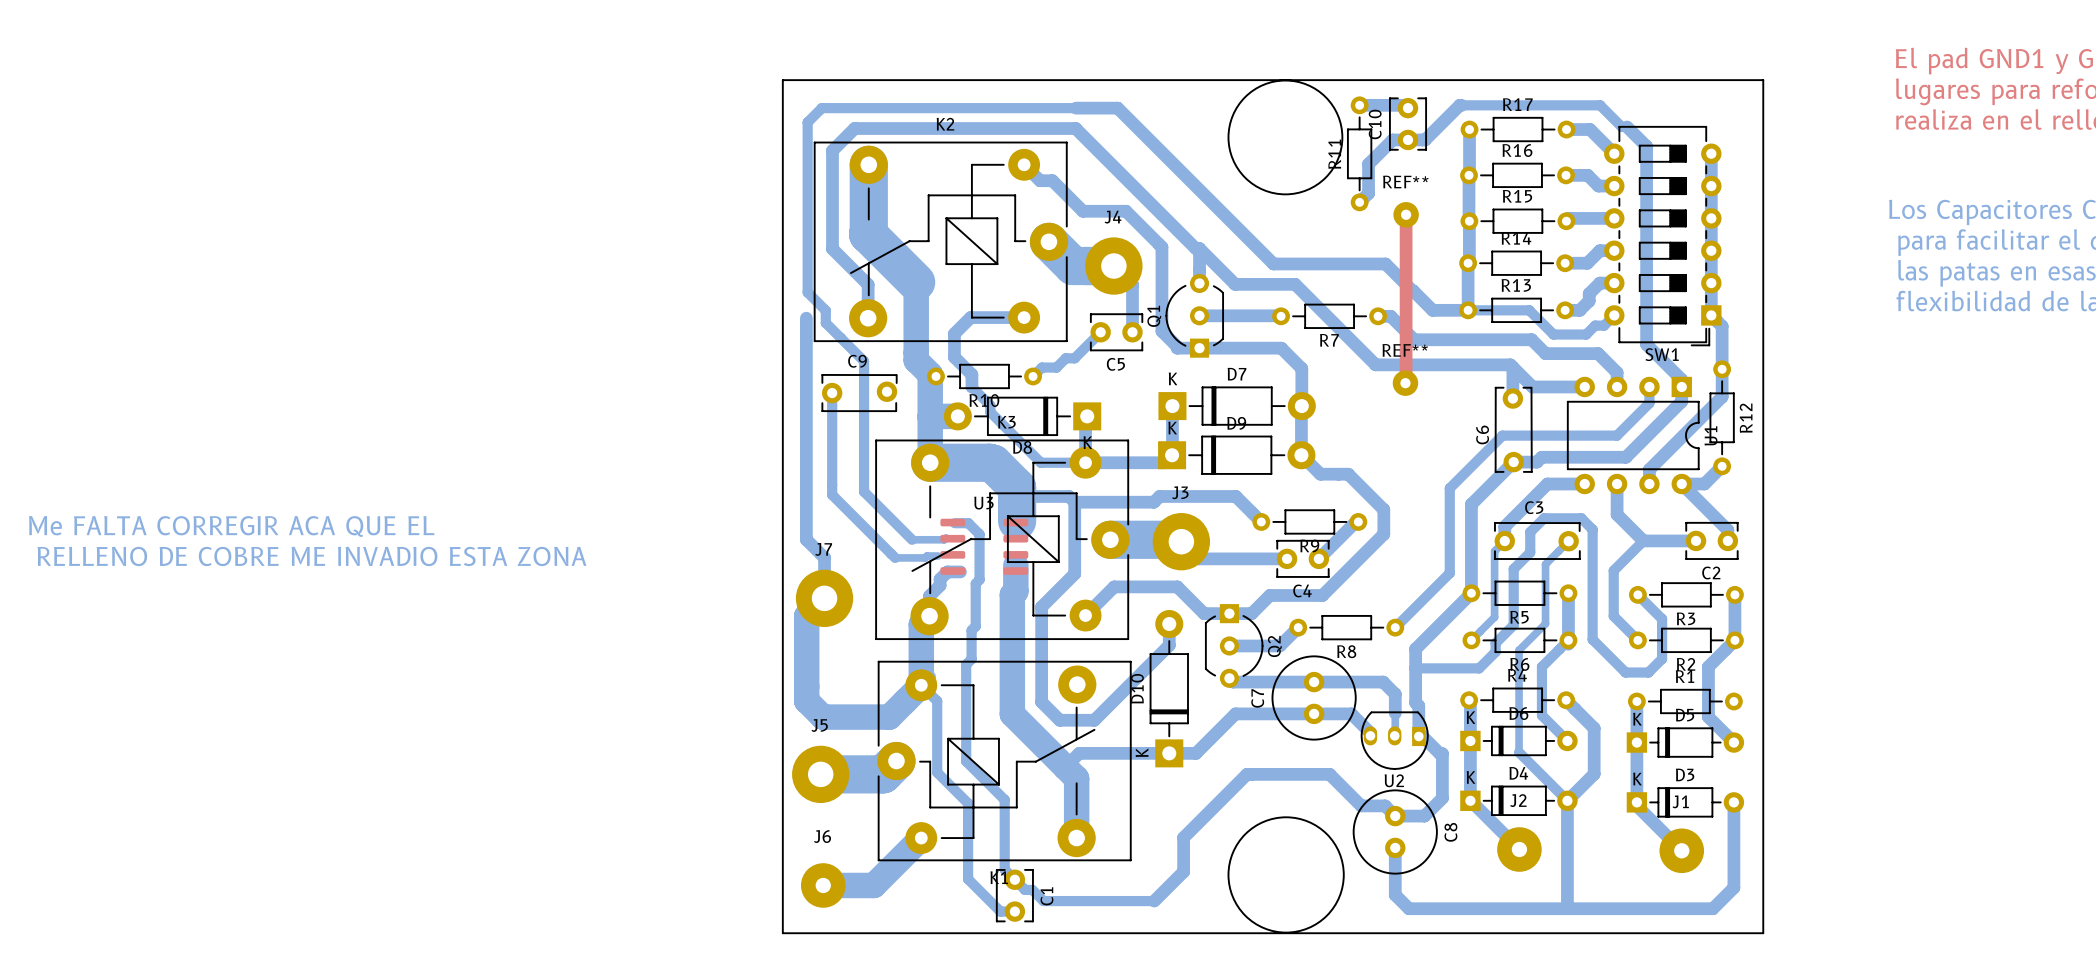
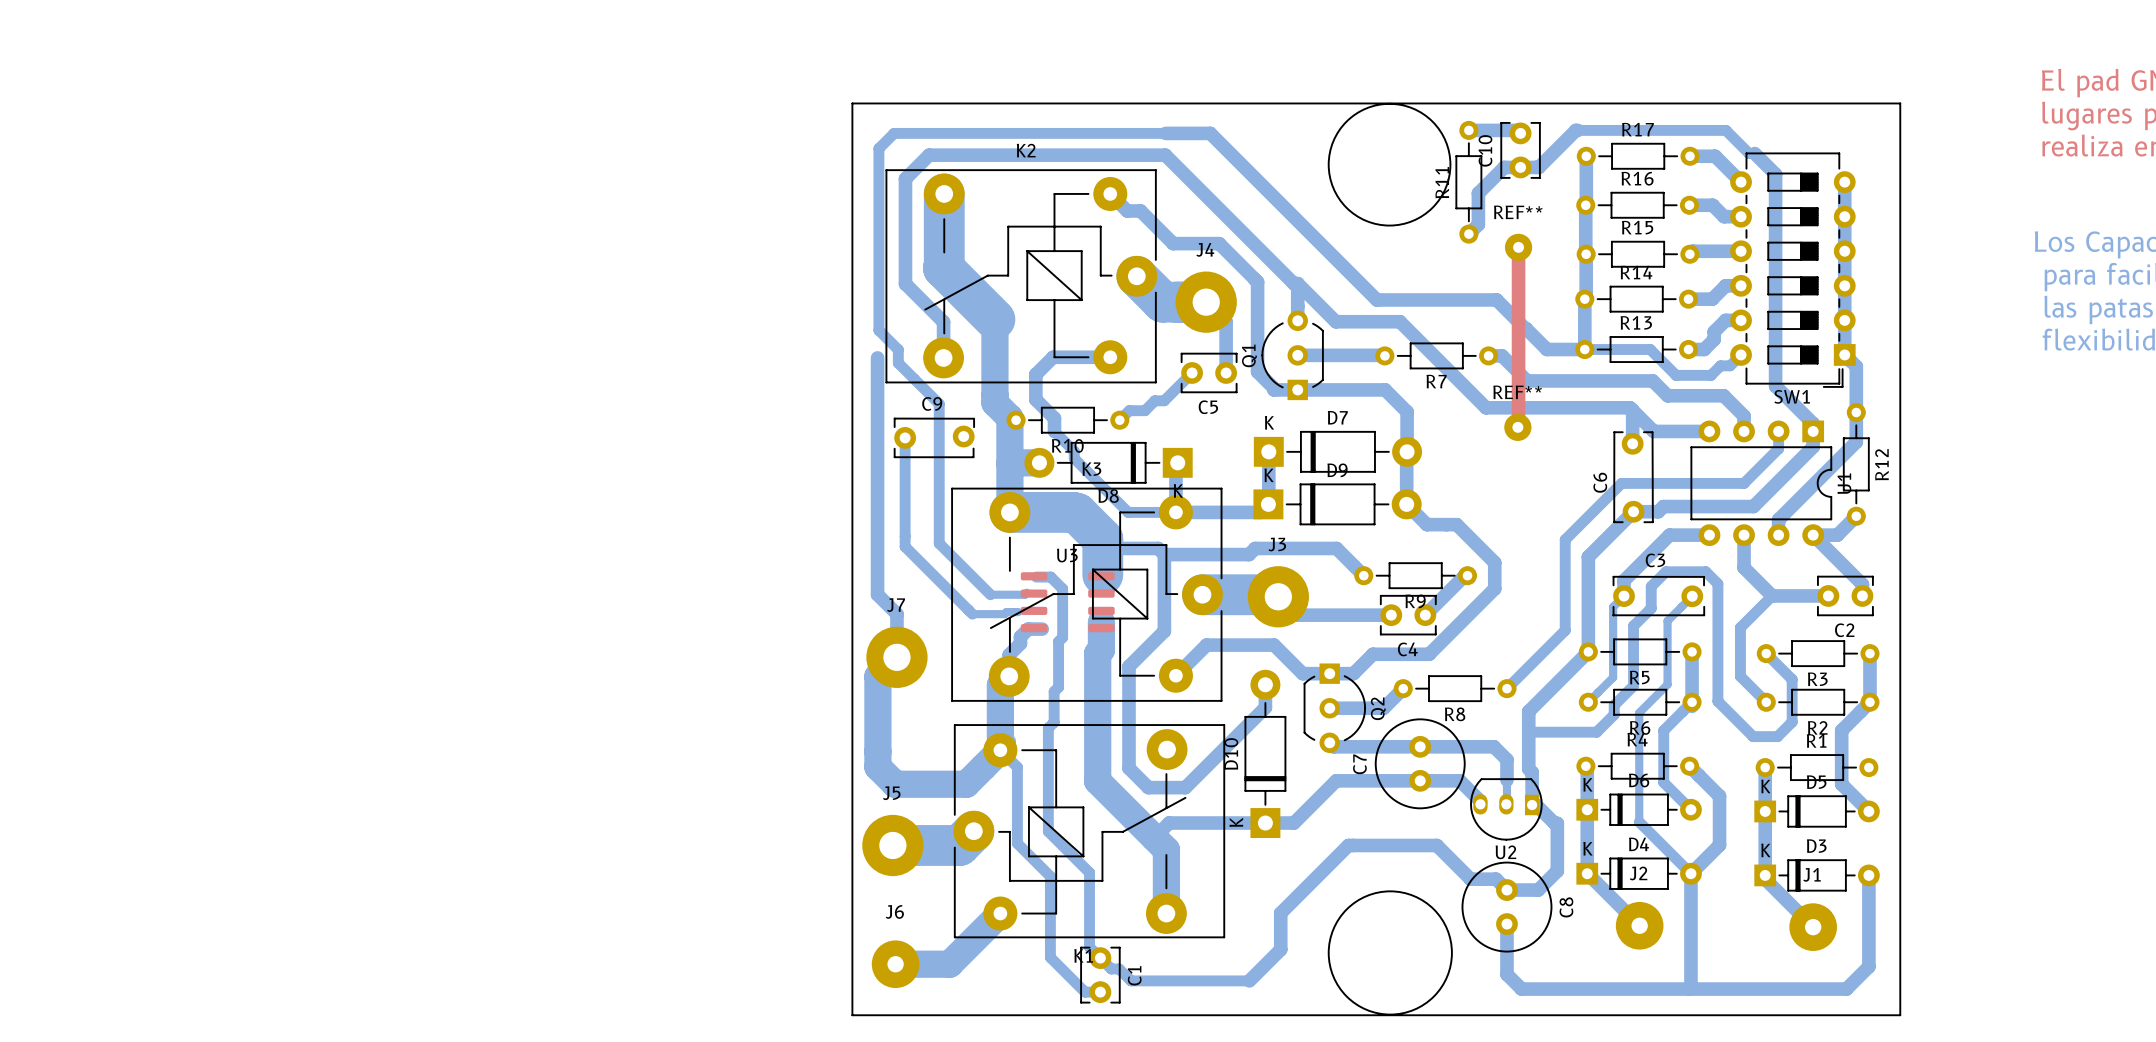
text: Me FALTA CORREGIR ACA QUE EL (231, 526) -> none
text: RELLENO DE COBRE ME INVADIO ESTA ZONA (311, 556) -> none

